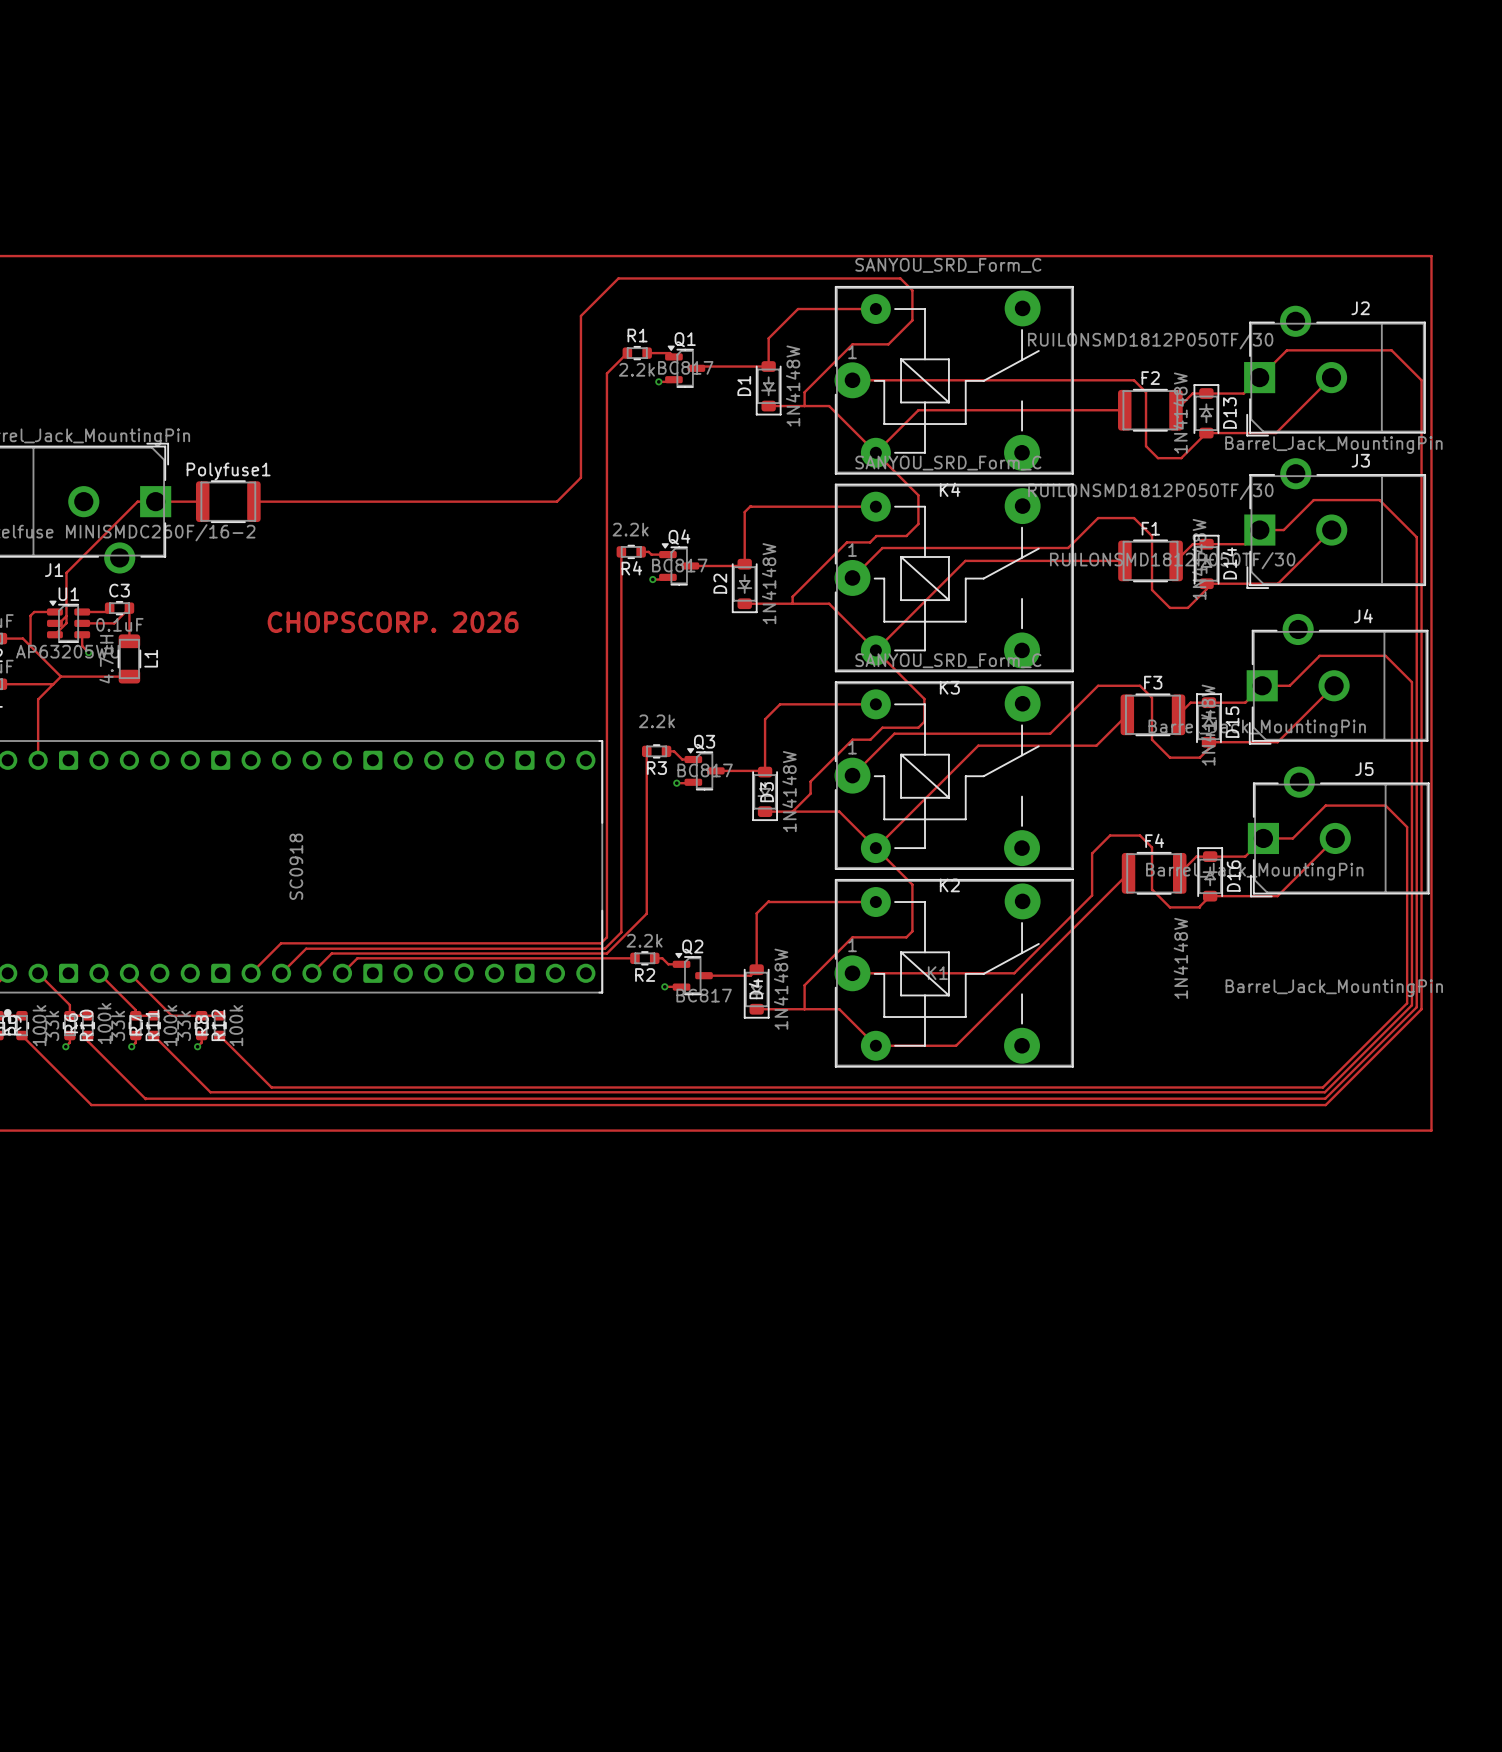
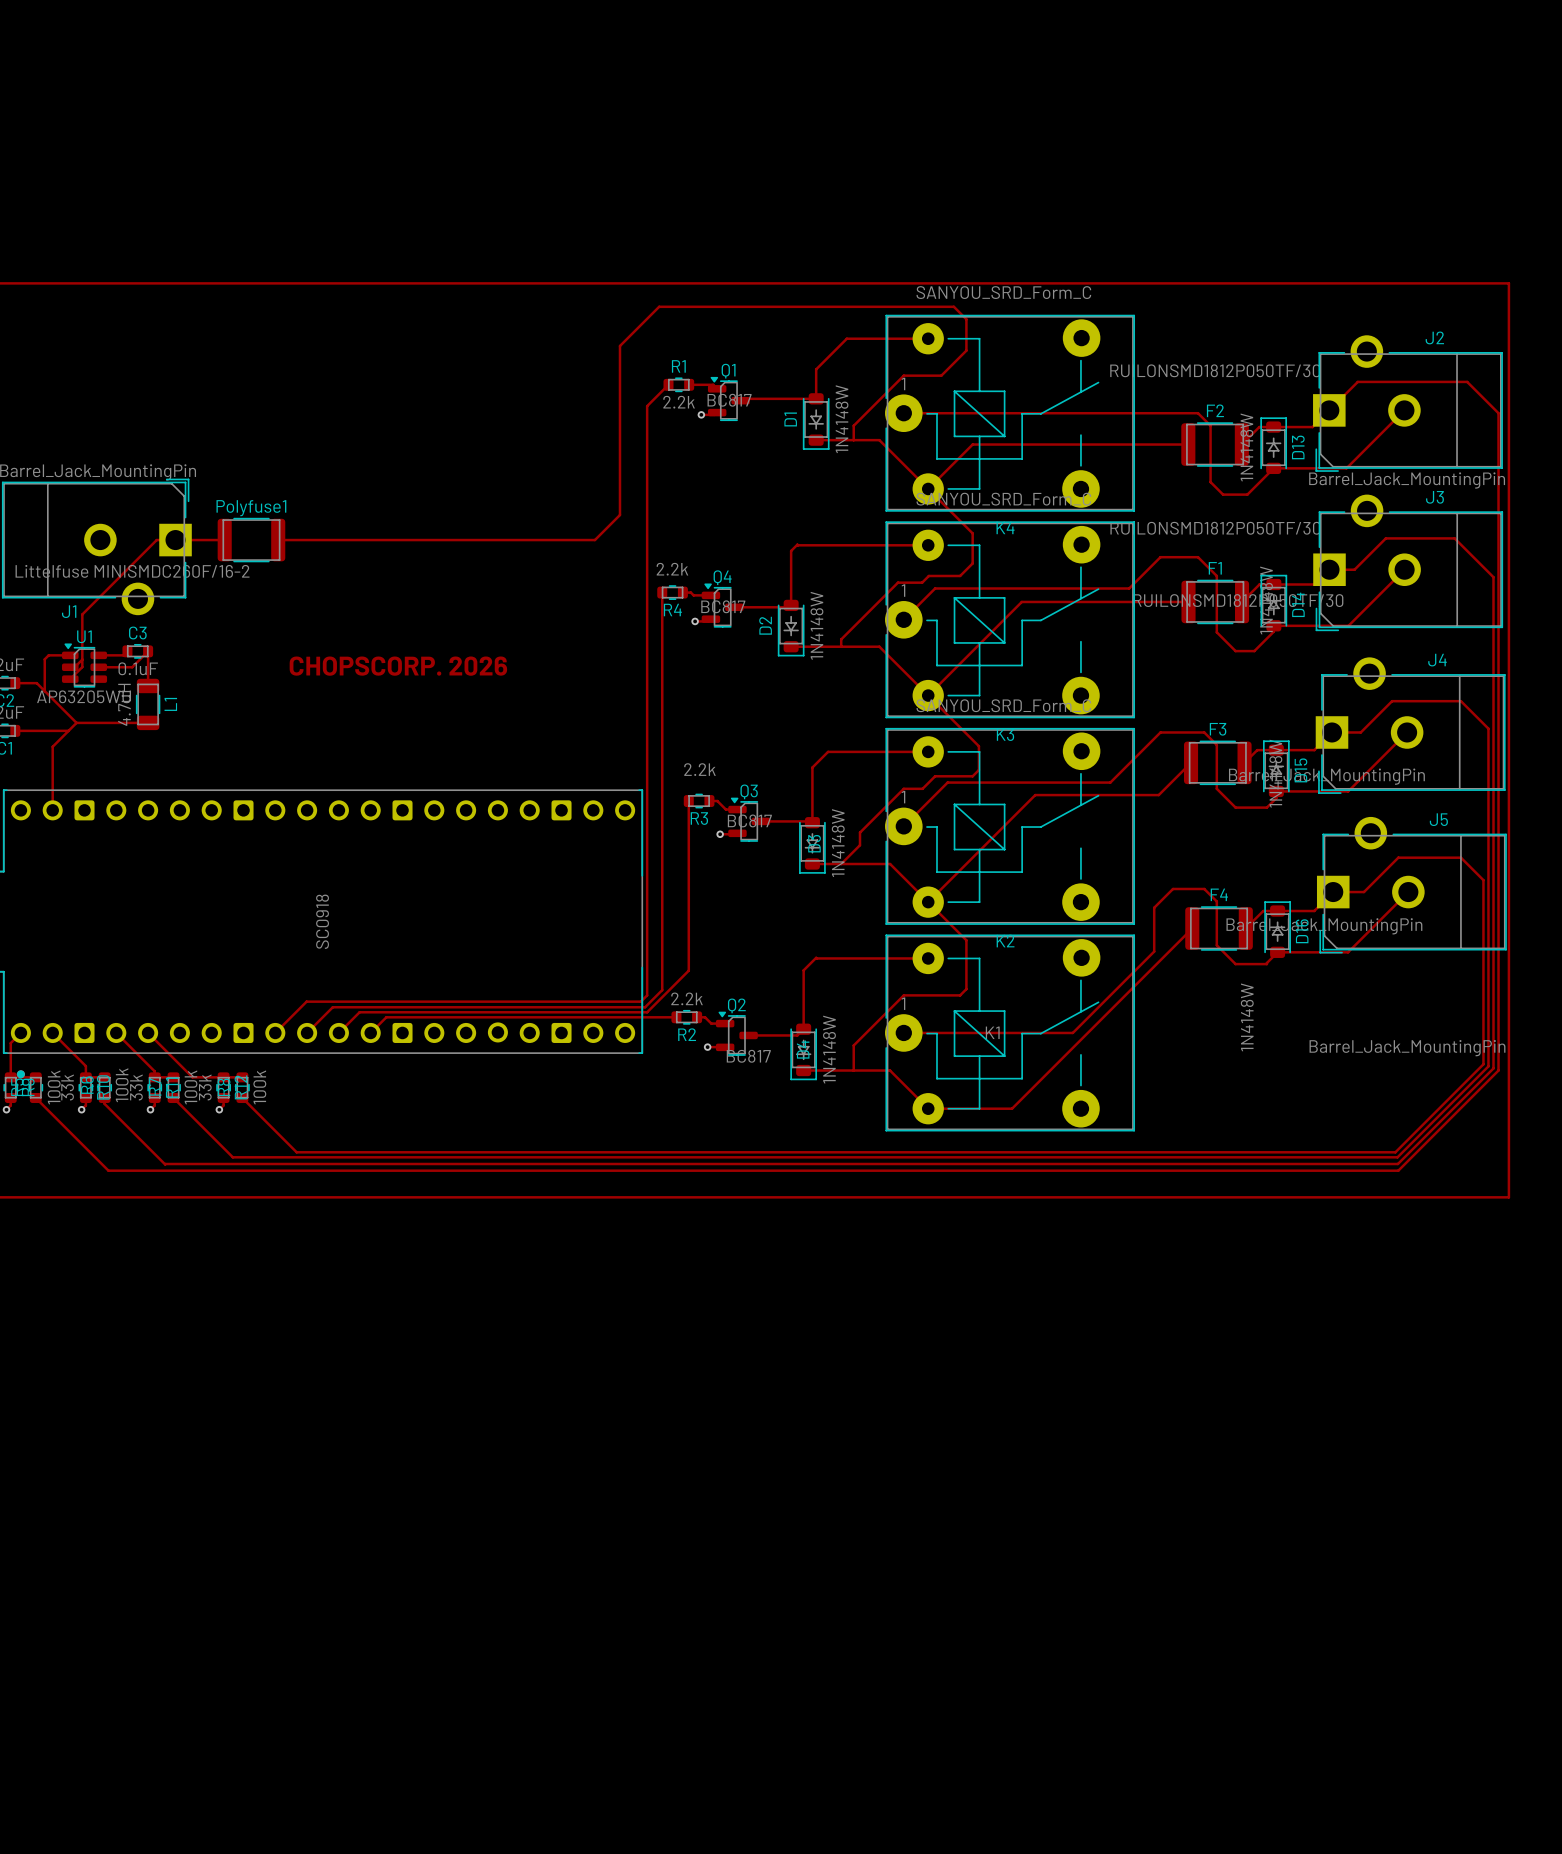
track: (82, 634) (82, 646) (88, 652) -> none
via: (88, 652) -> none

